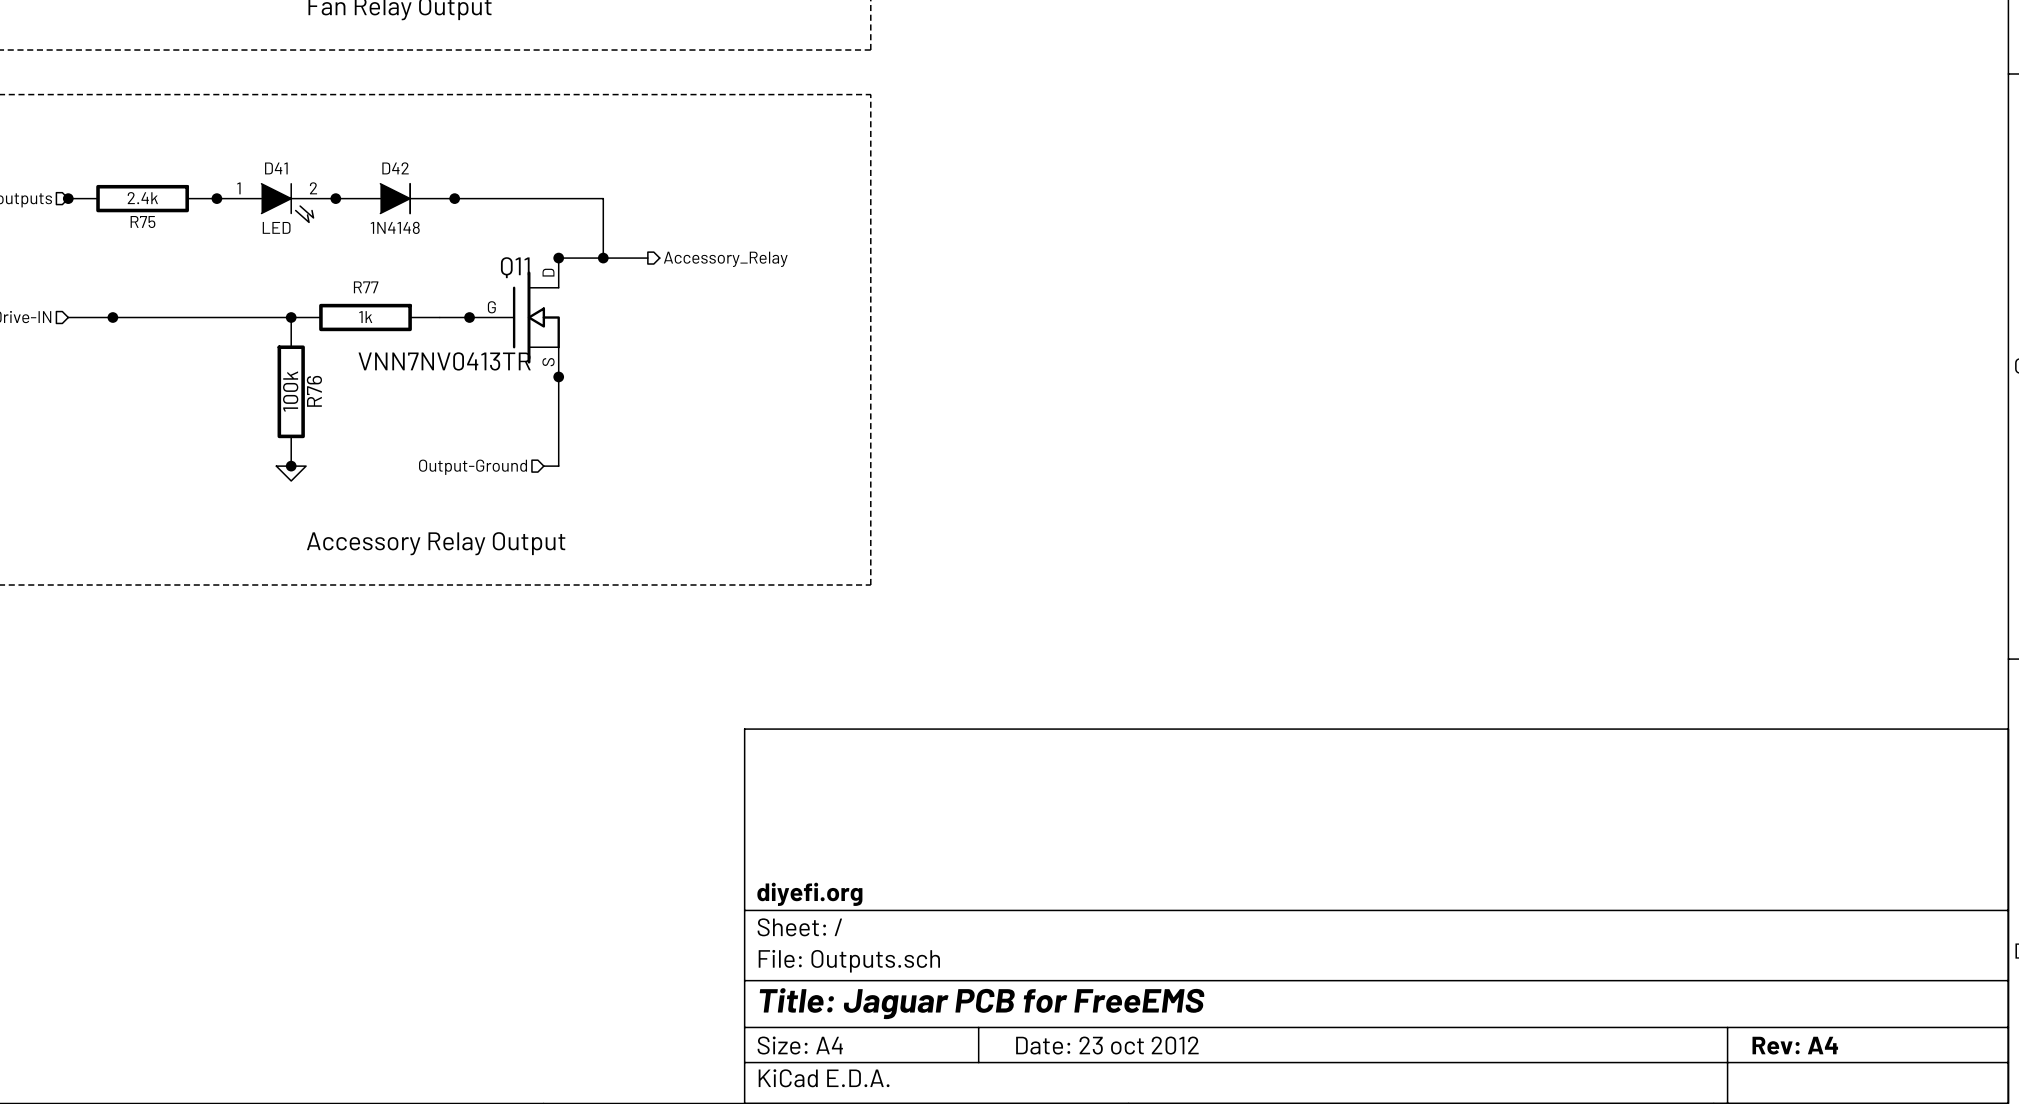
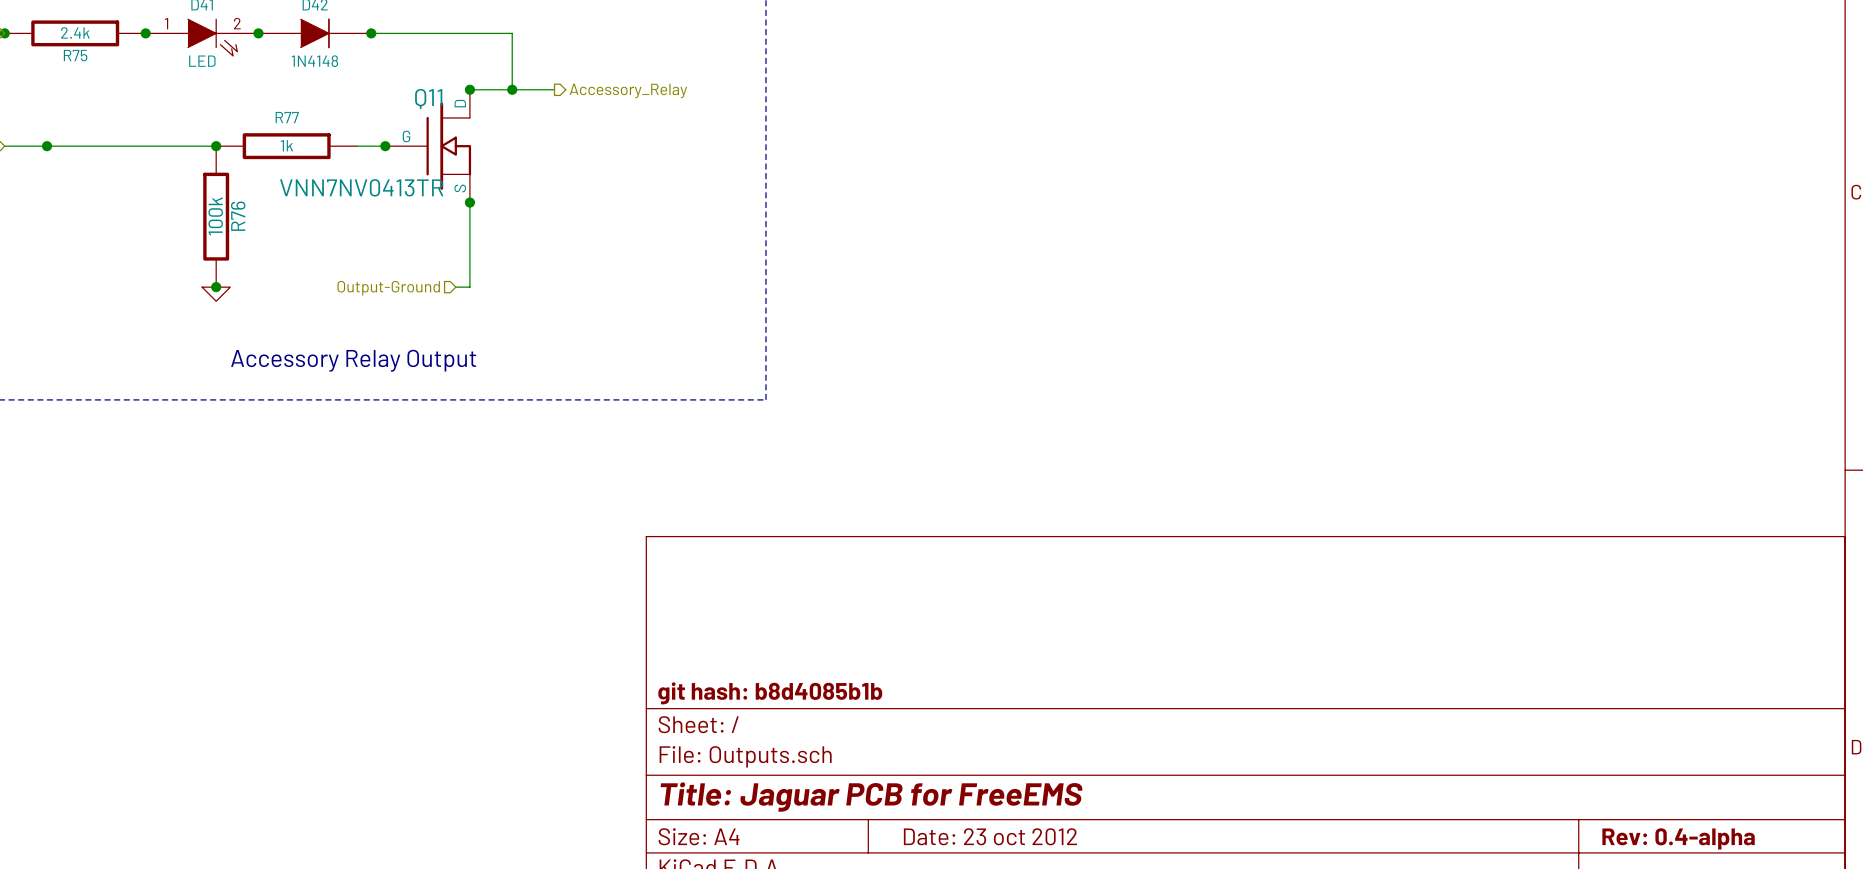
title block: diyefi.org (809, 894) -> git hash: b8d4085b1b (770, 693)
title block: Rev: A4 (1795, 1045) -> Rev: 0.4-alpha (1678, 838)

